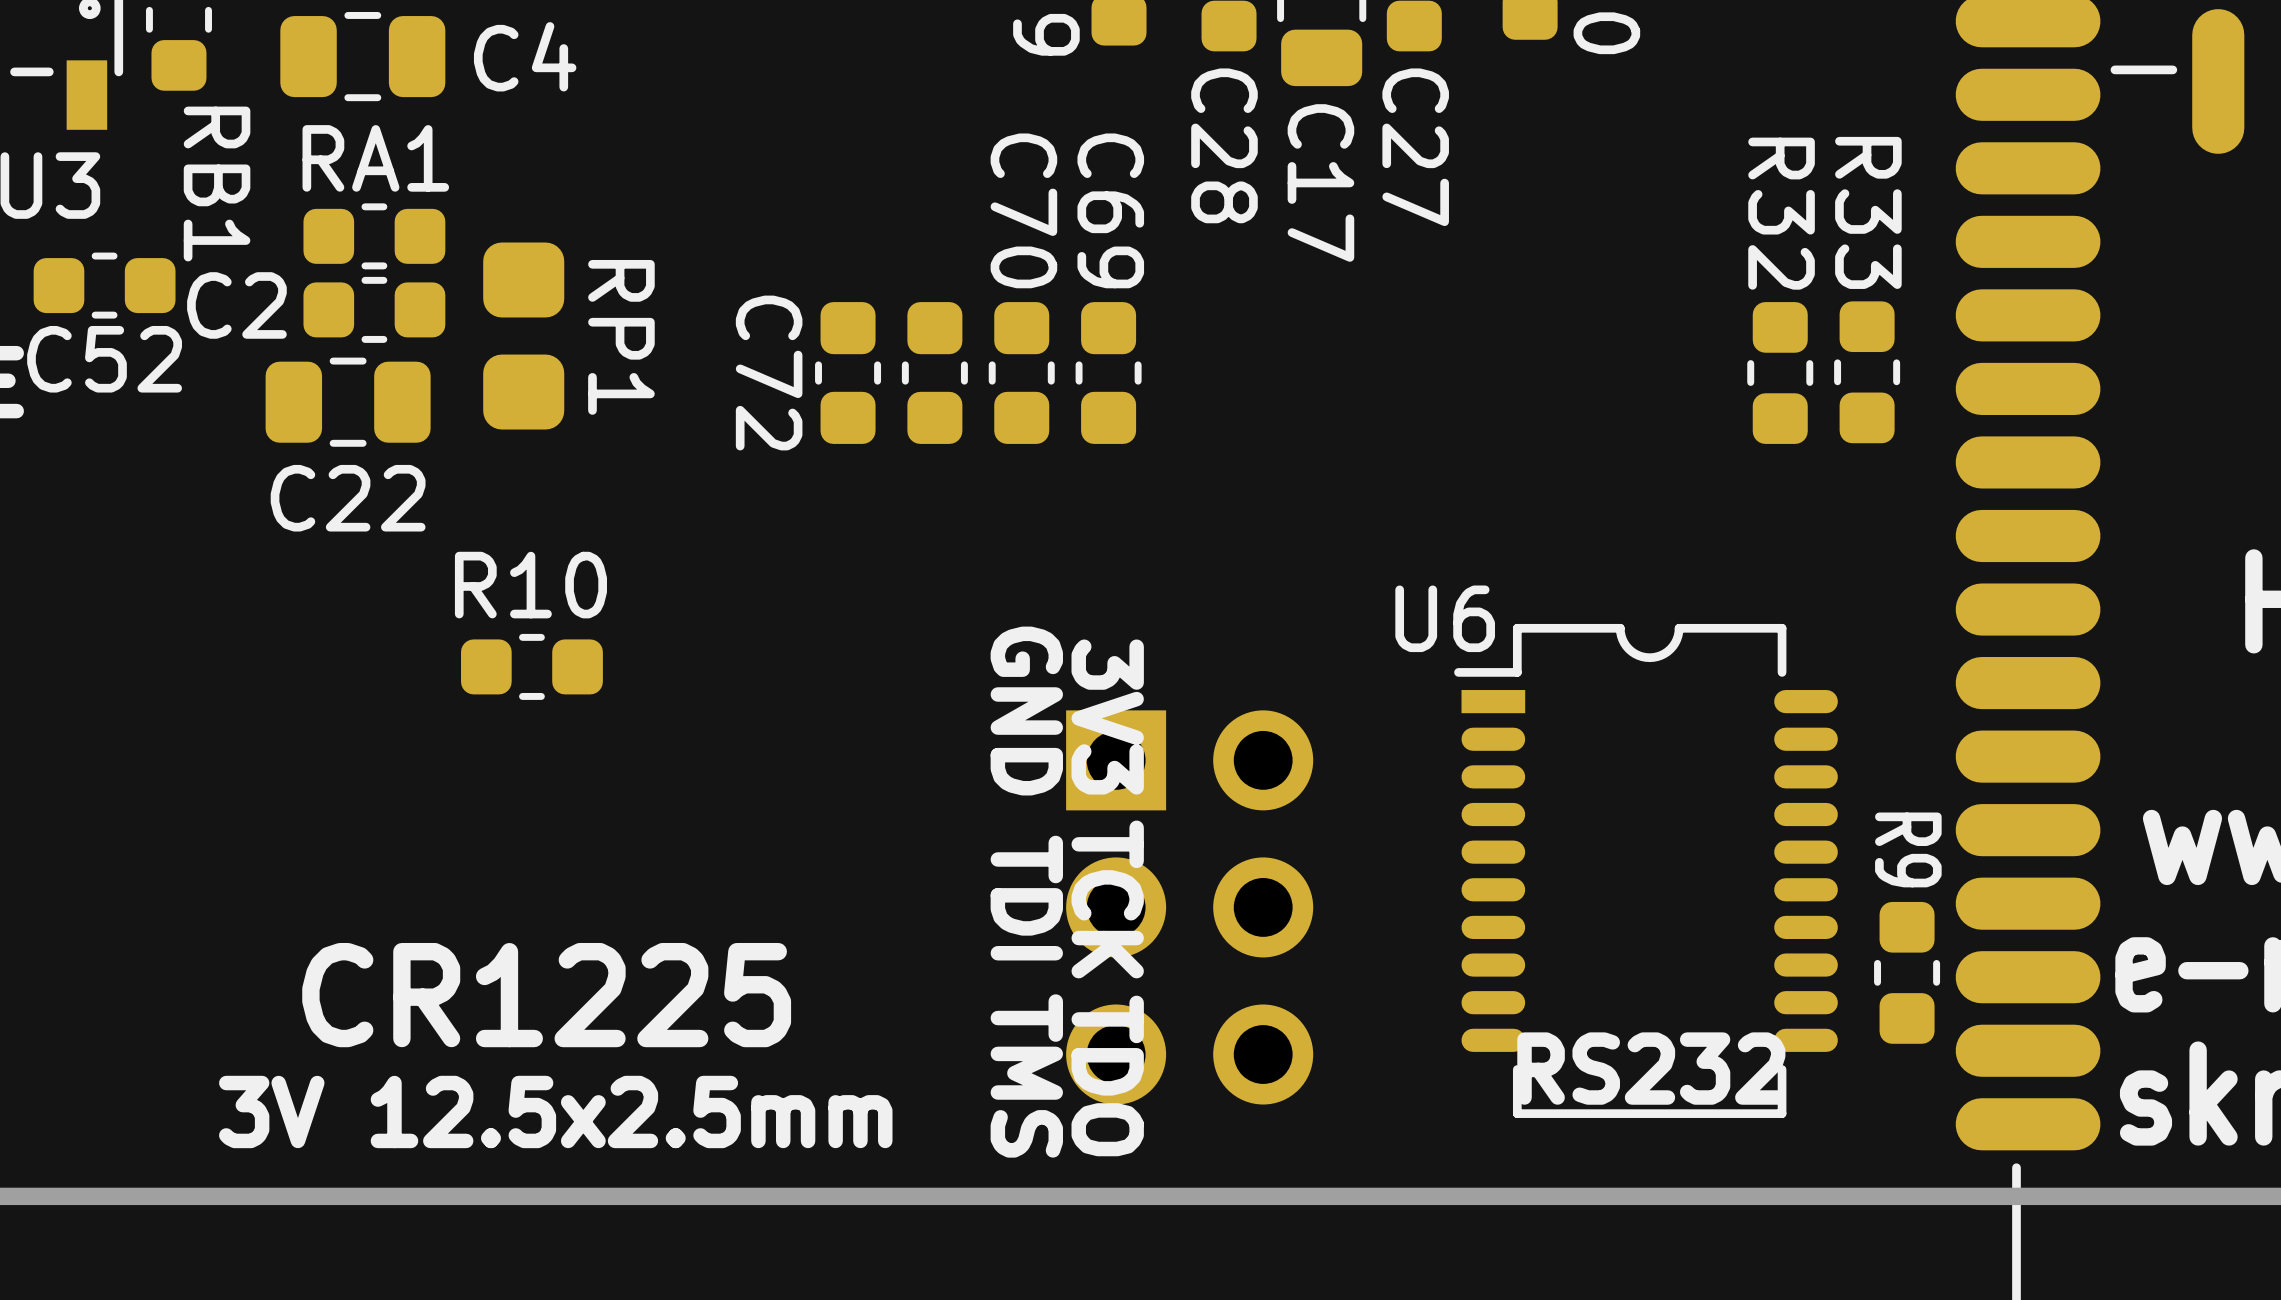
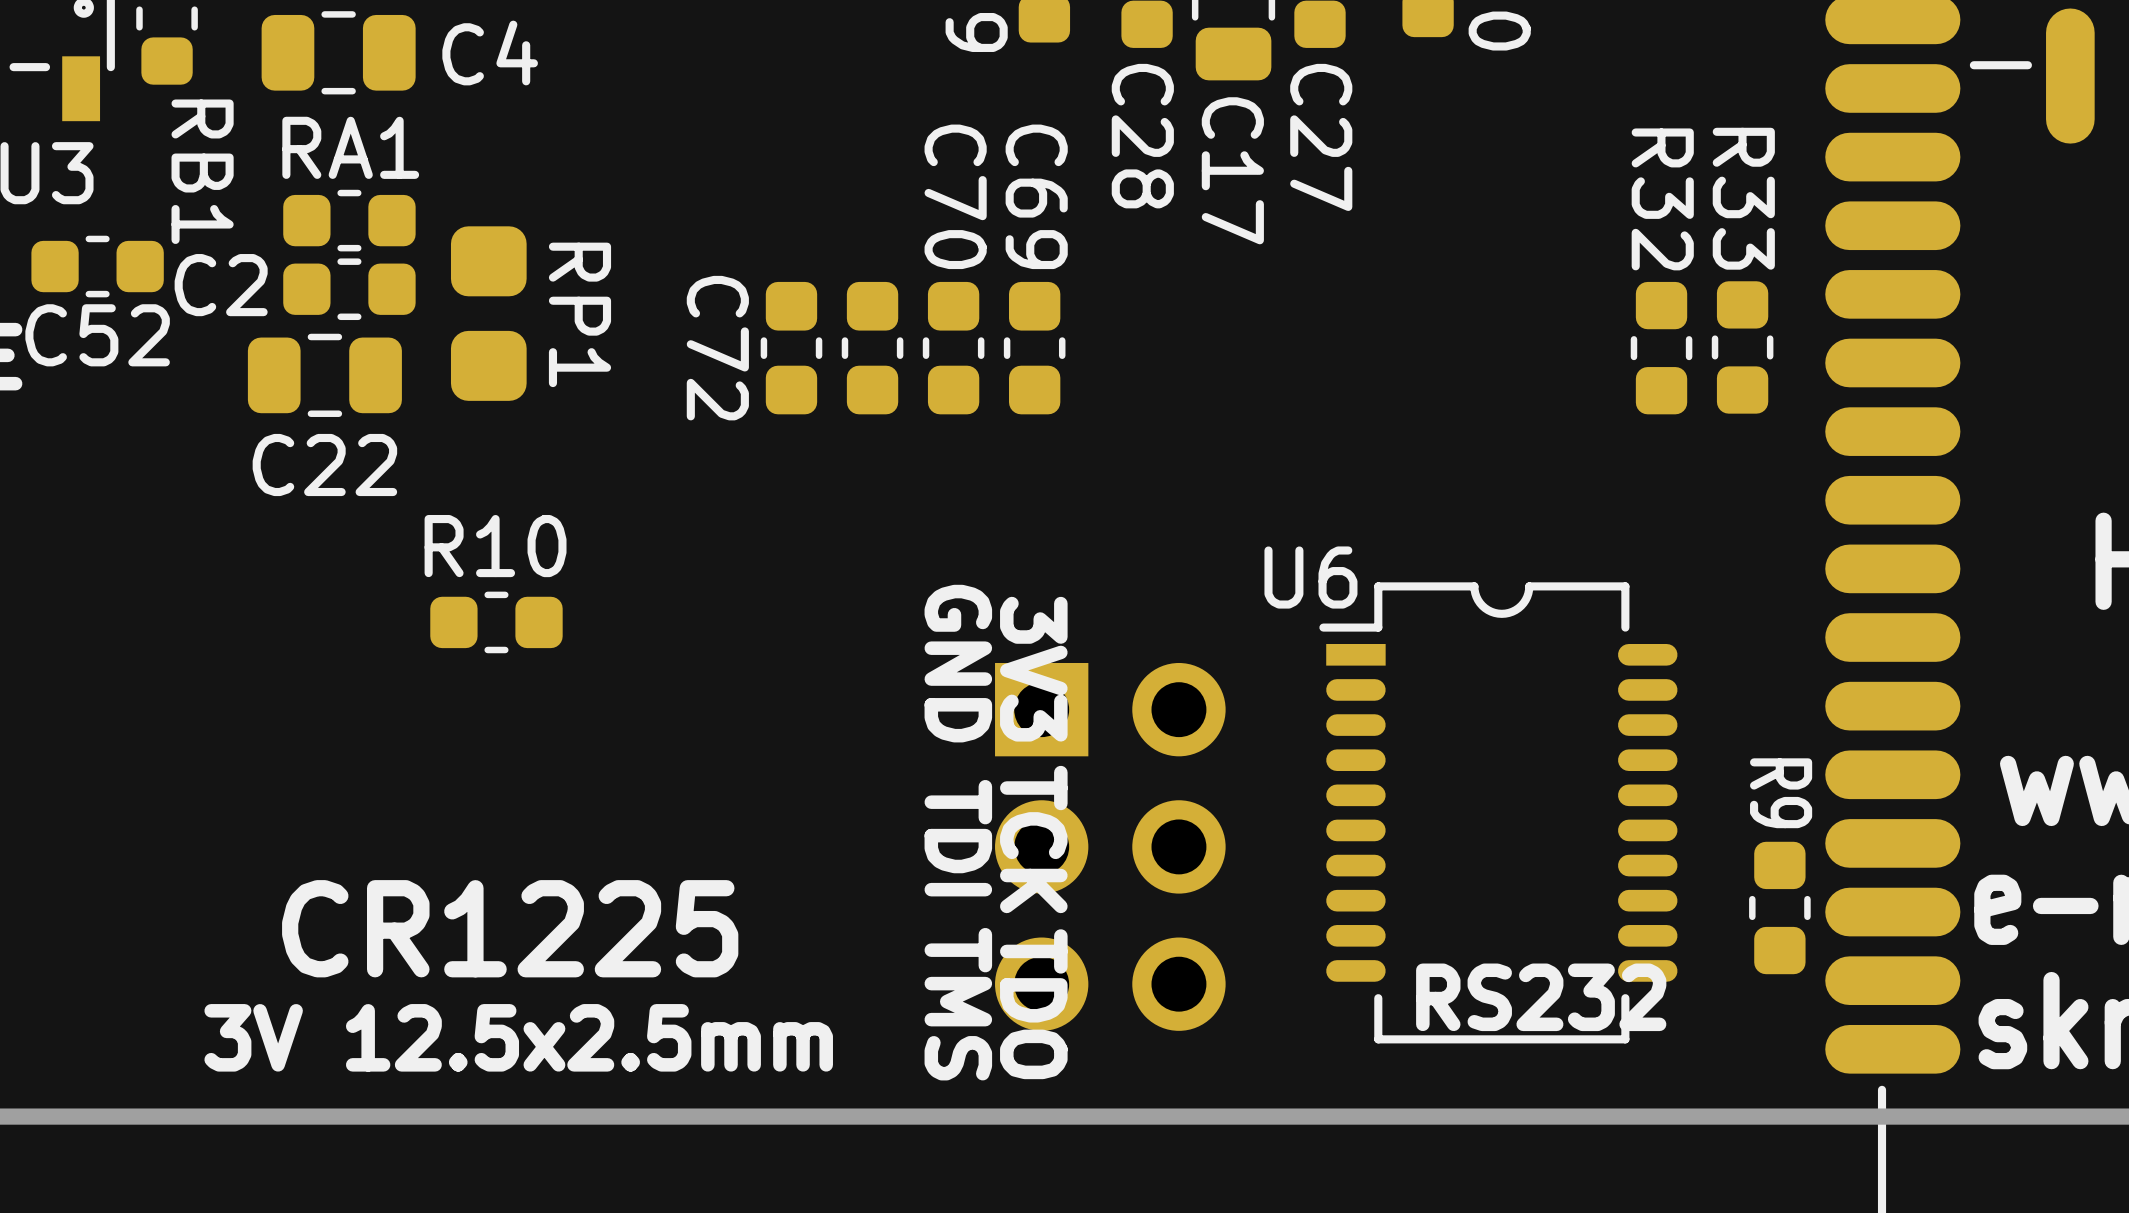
U6 position: (1646, 870) -> (1498, 812)

